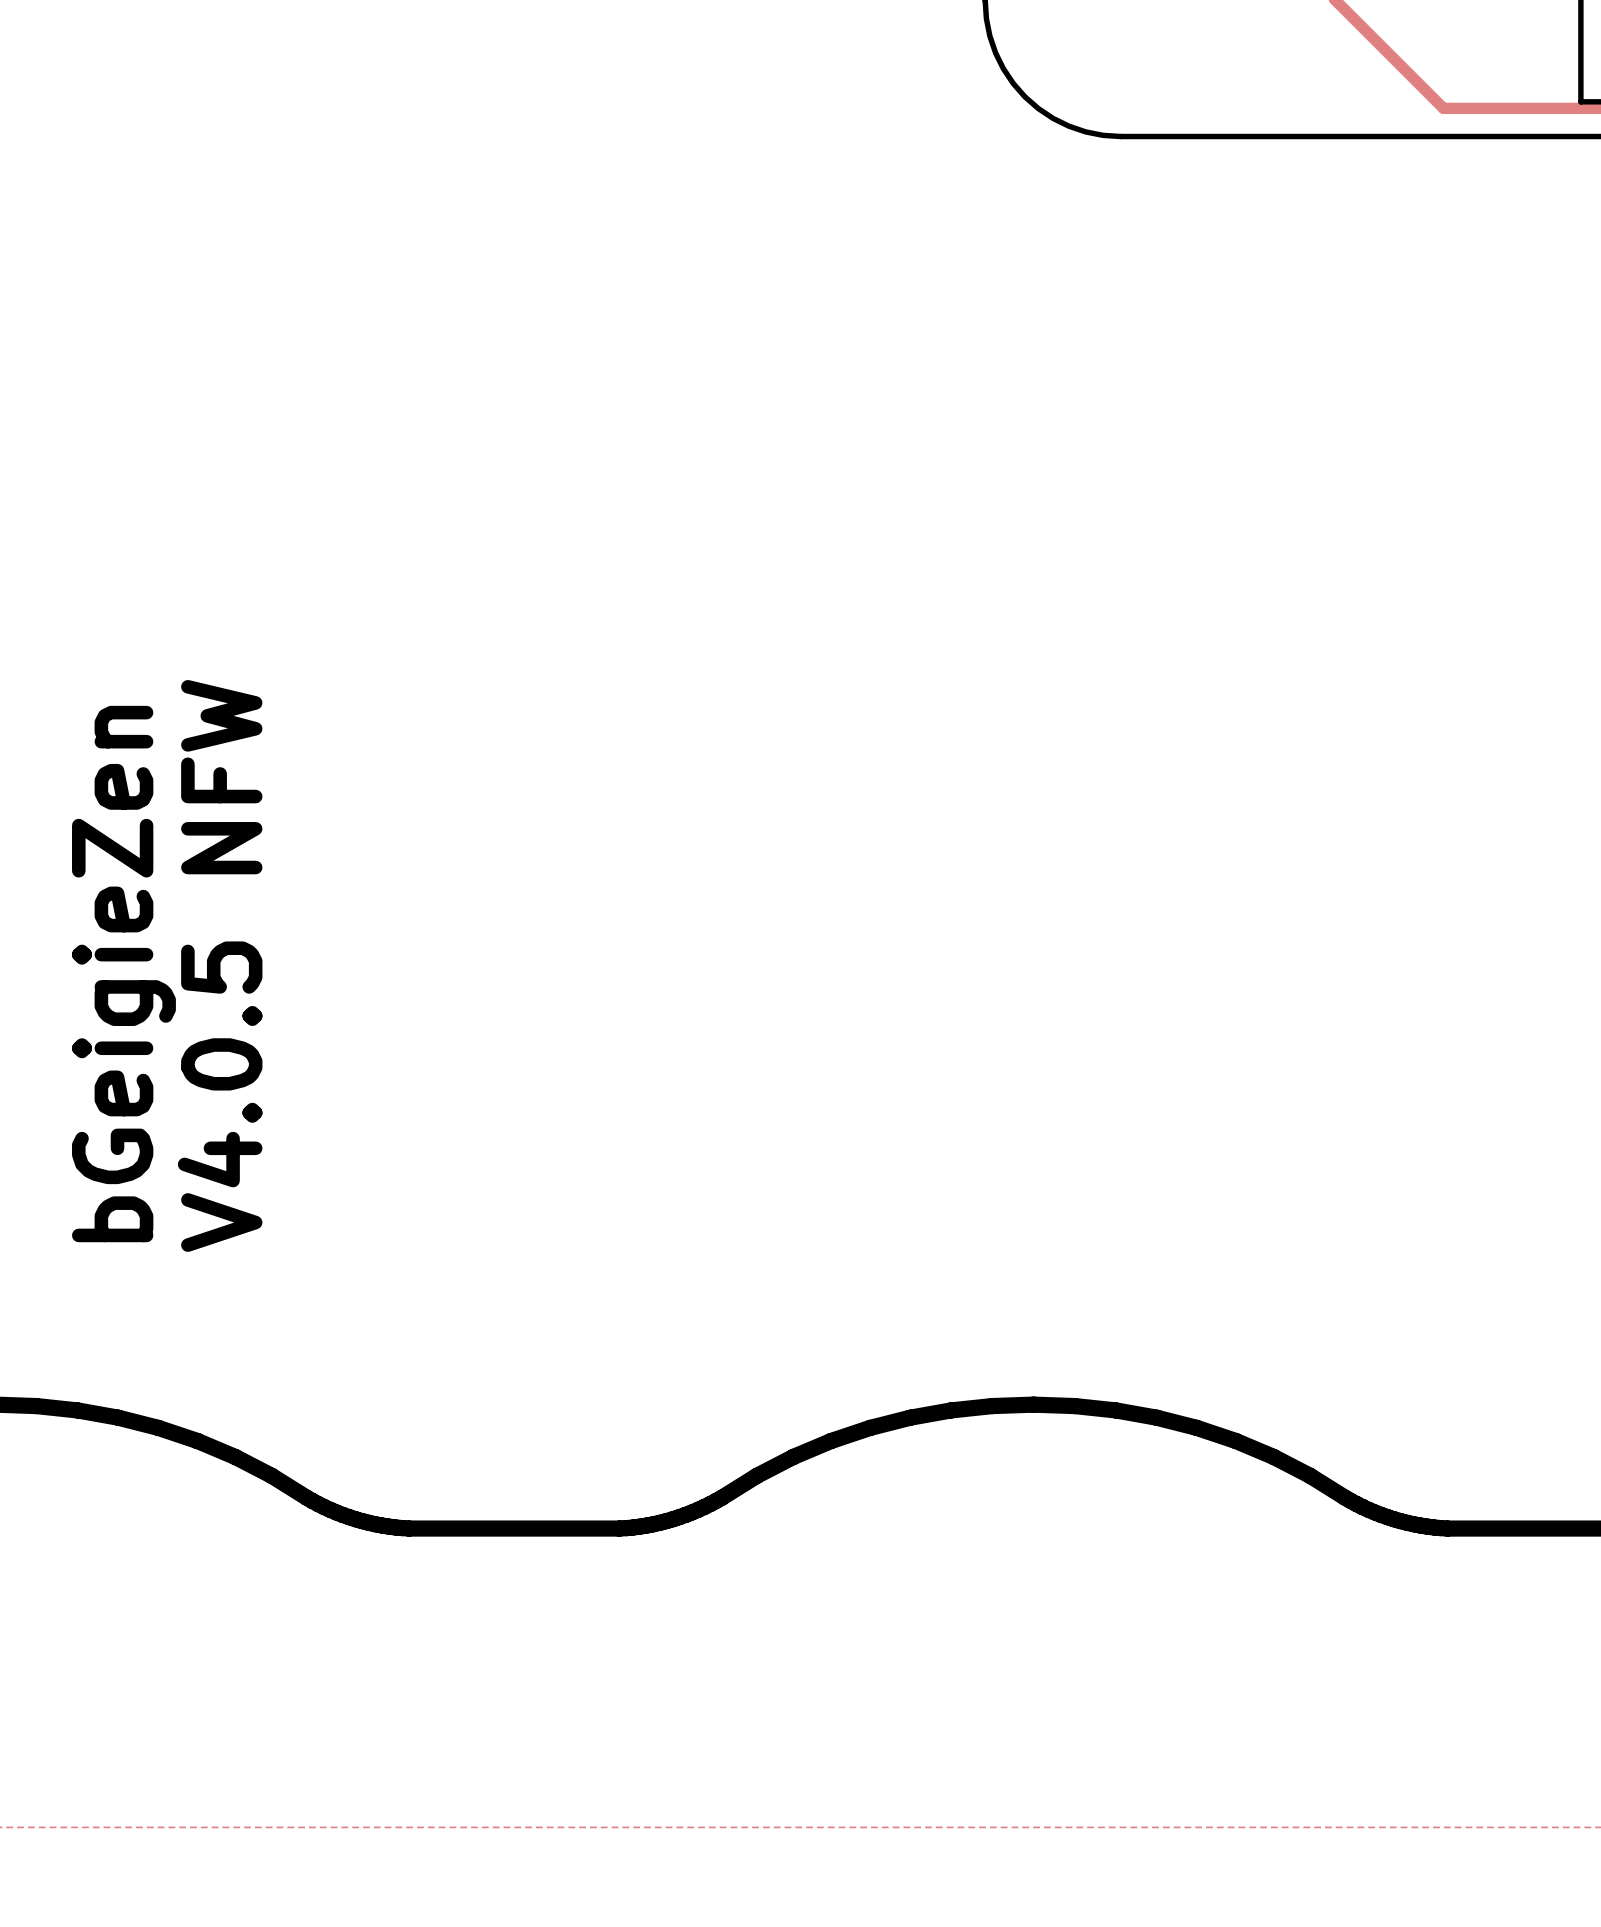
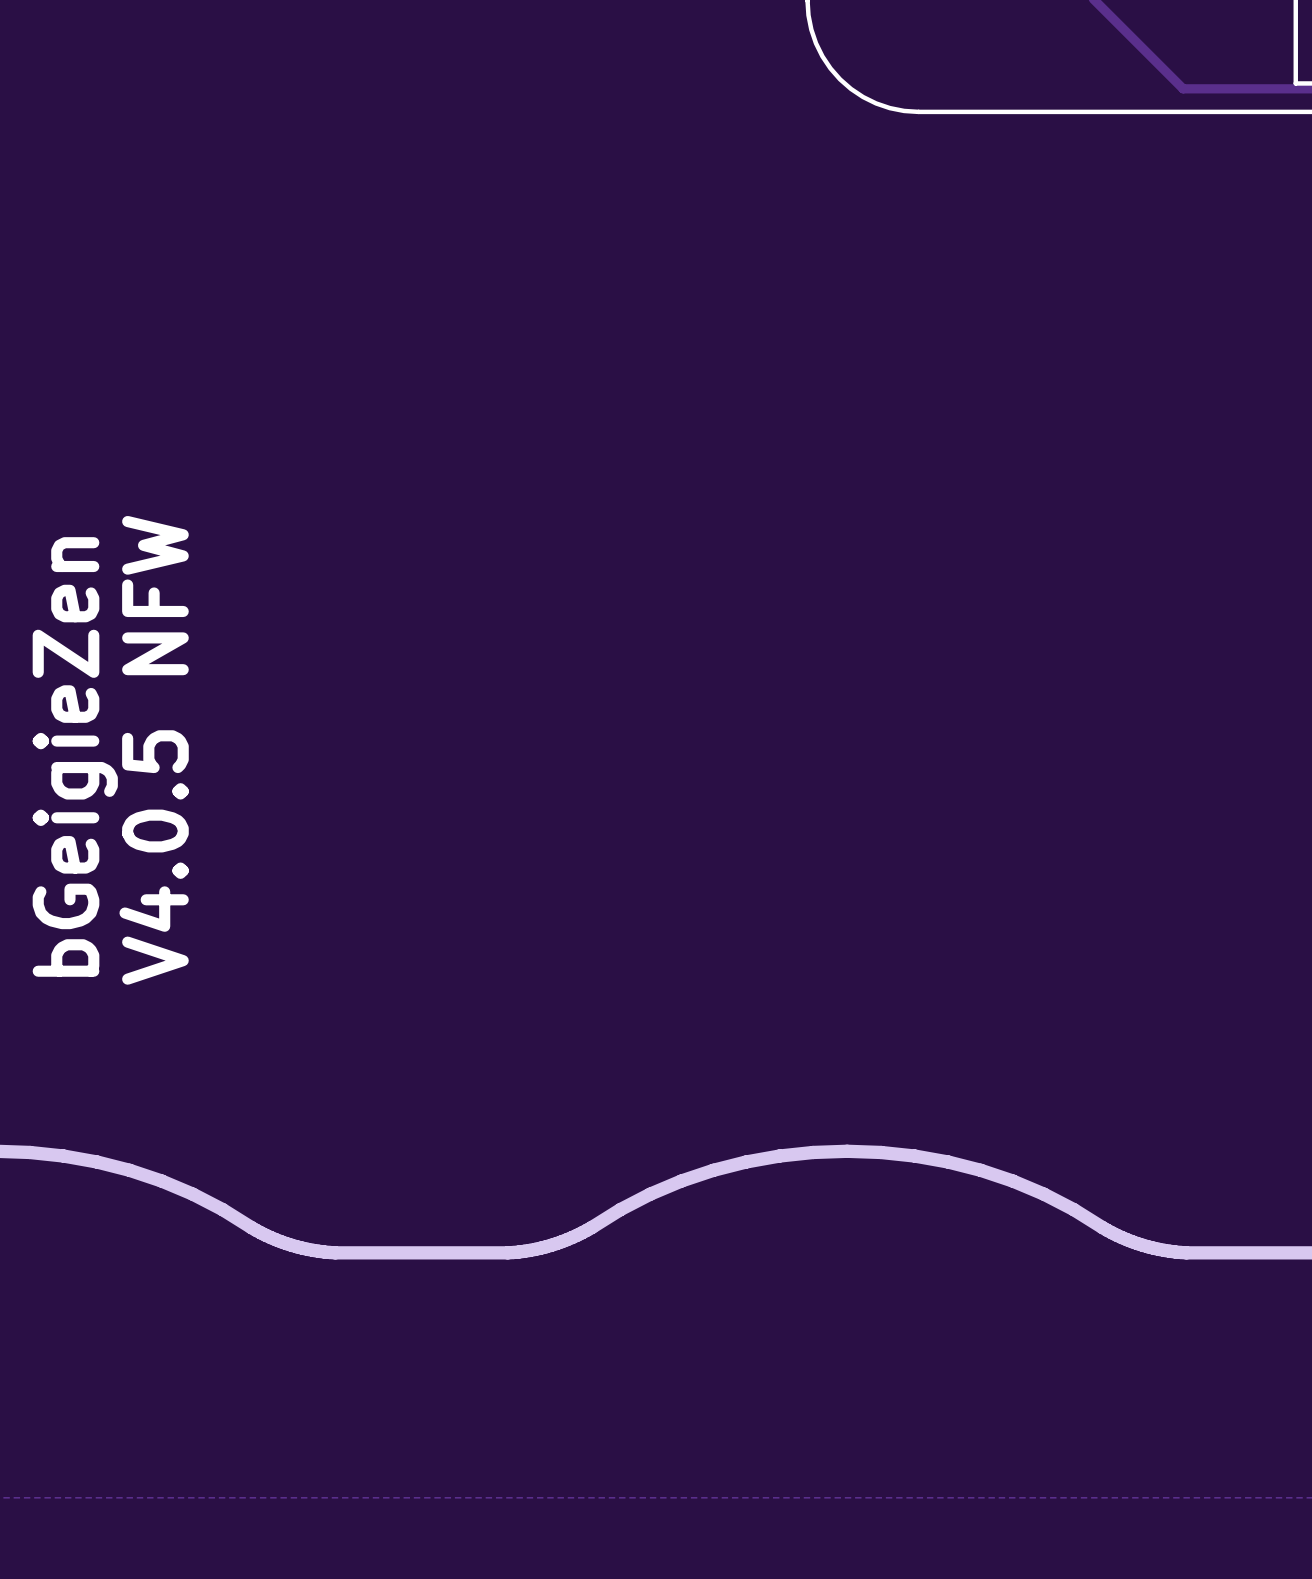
text position: V4.0.5 NFW (220, 965) -> V4.0.5 NFW (154, 750)
text position: bGeigieZen (123, 974) -> bGeigieZen (75, 756)

